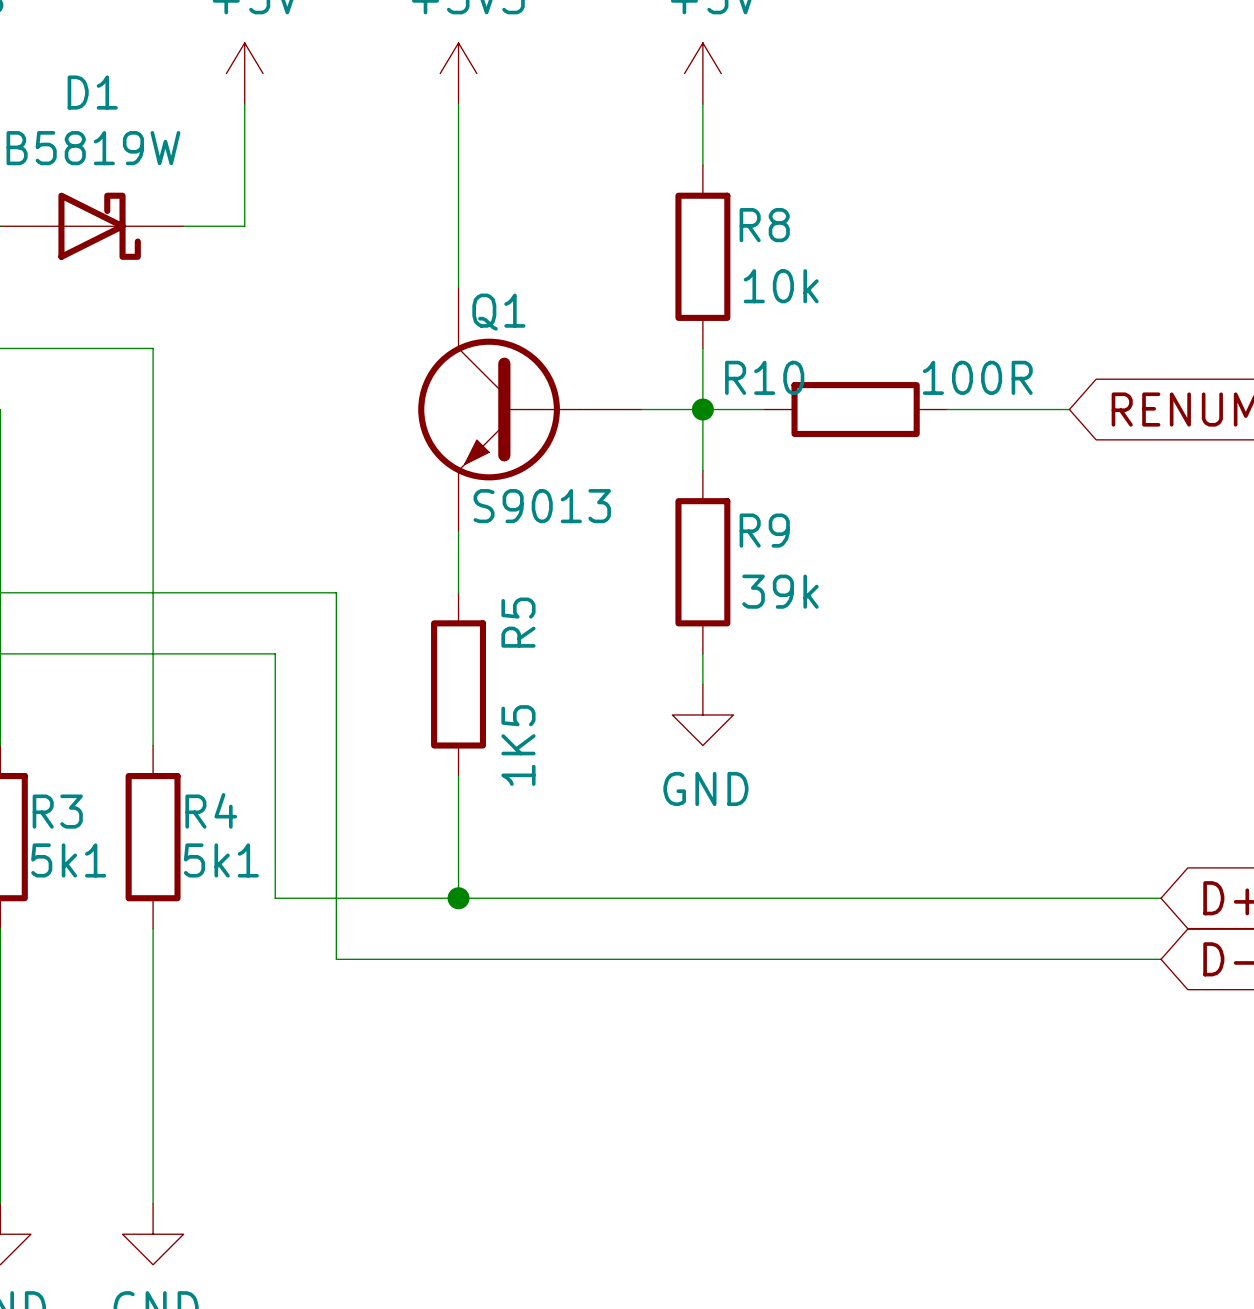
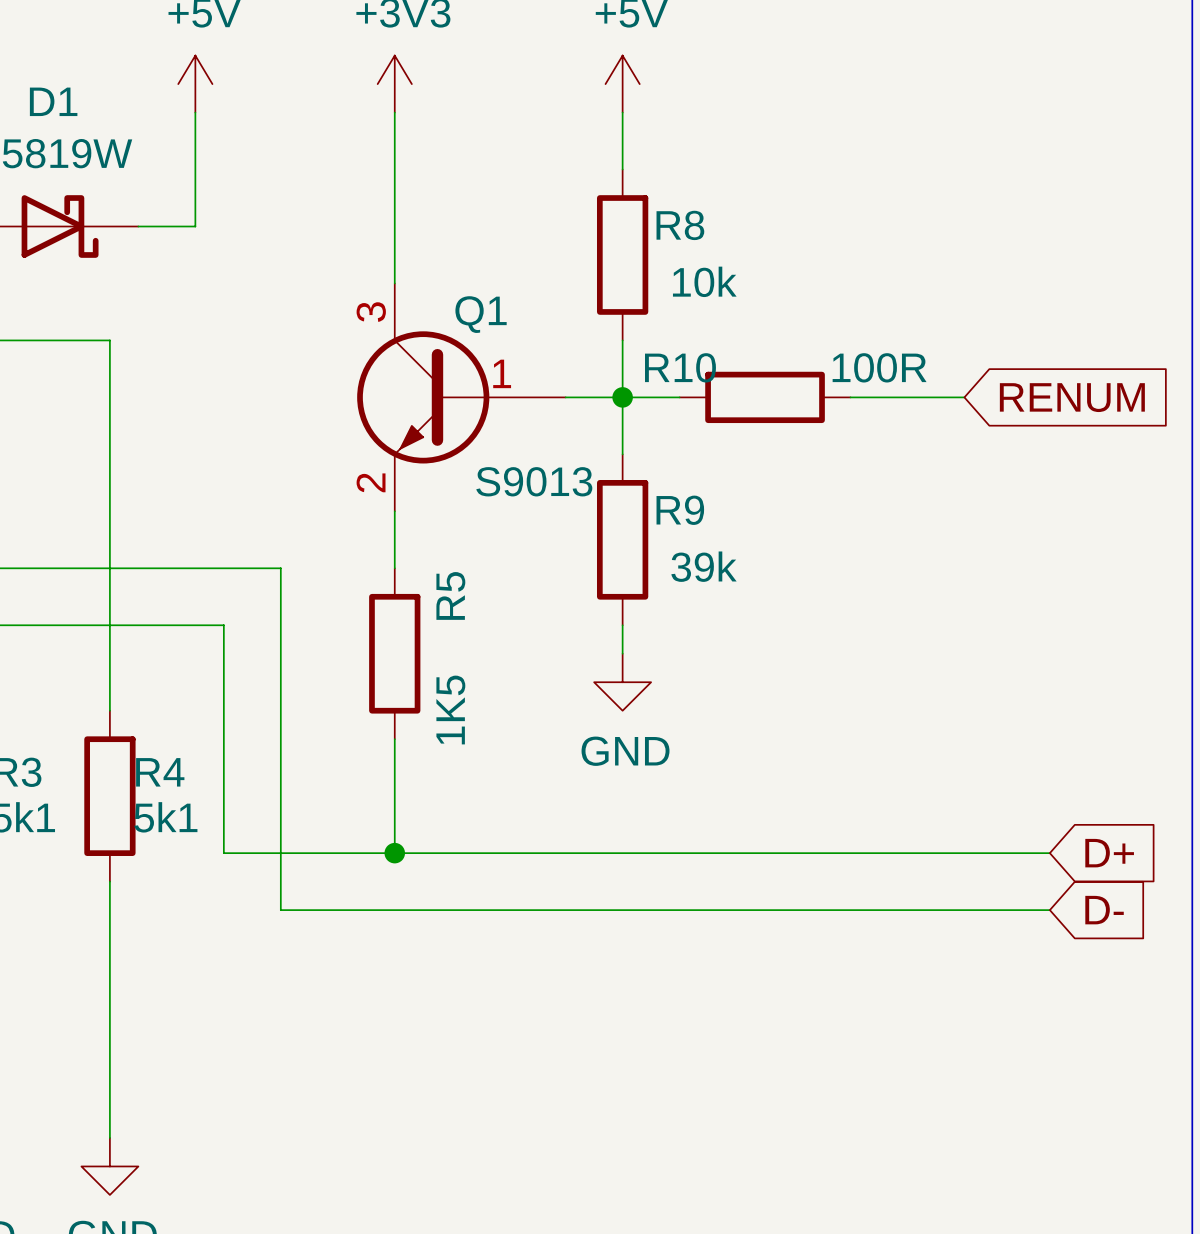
Q1 symbol: [418, 287, 642, 532] -> [357, 283, 566, 512]
Q1 name position: Q1 (498, 312) -> Q1 (481, 314)
Q1 value position: S9013 (542, 506) -> S9013 (534, 481)

